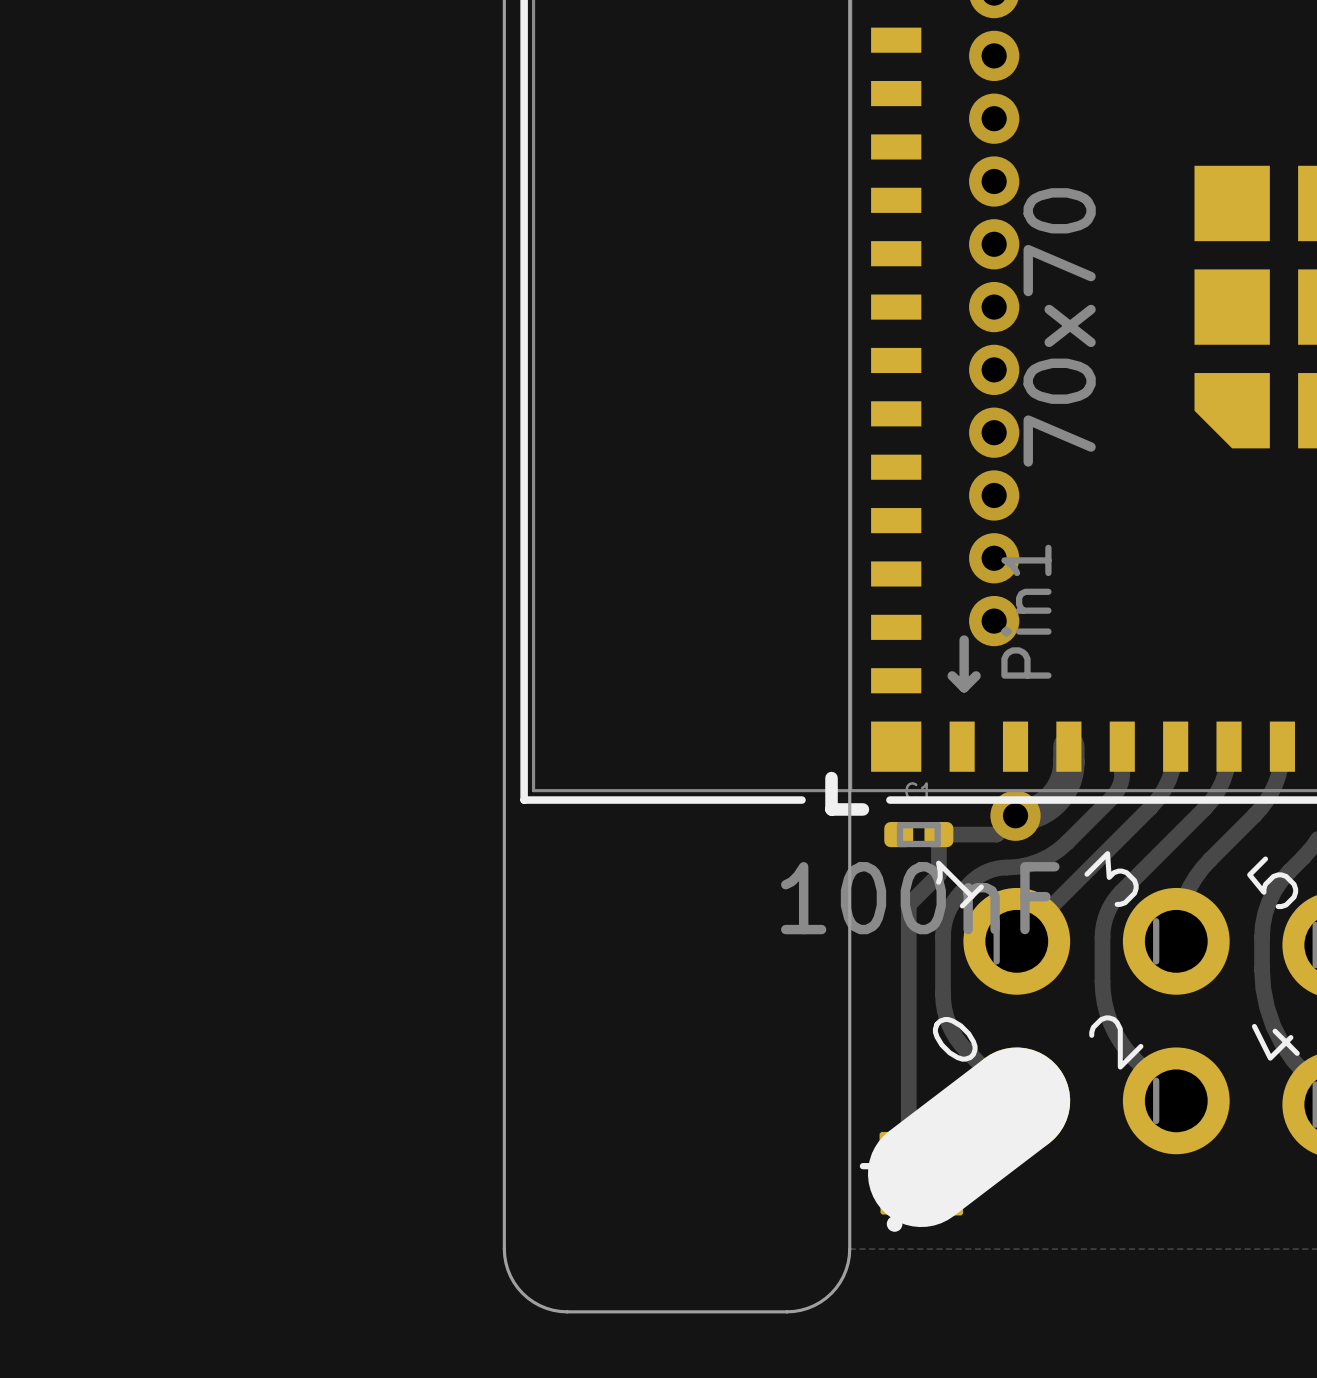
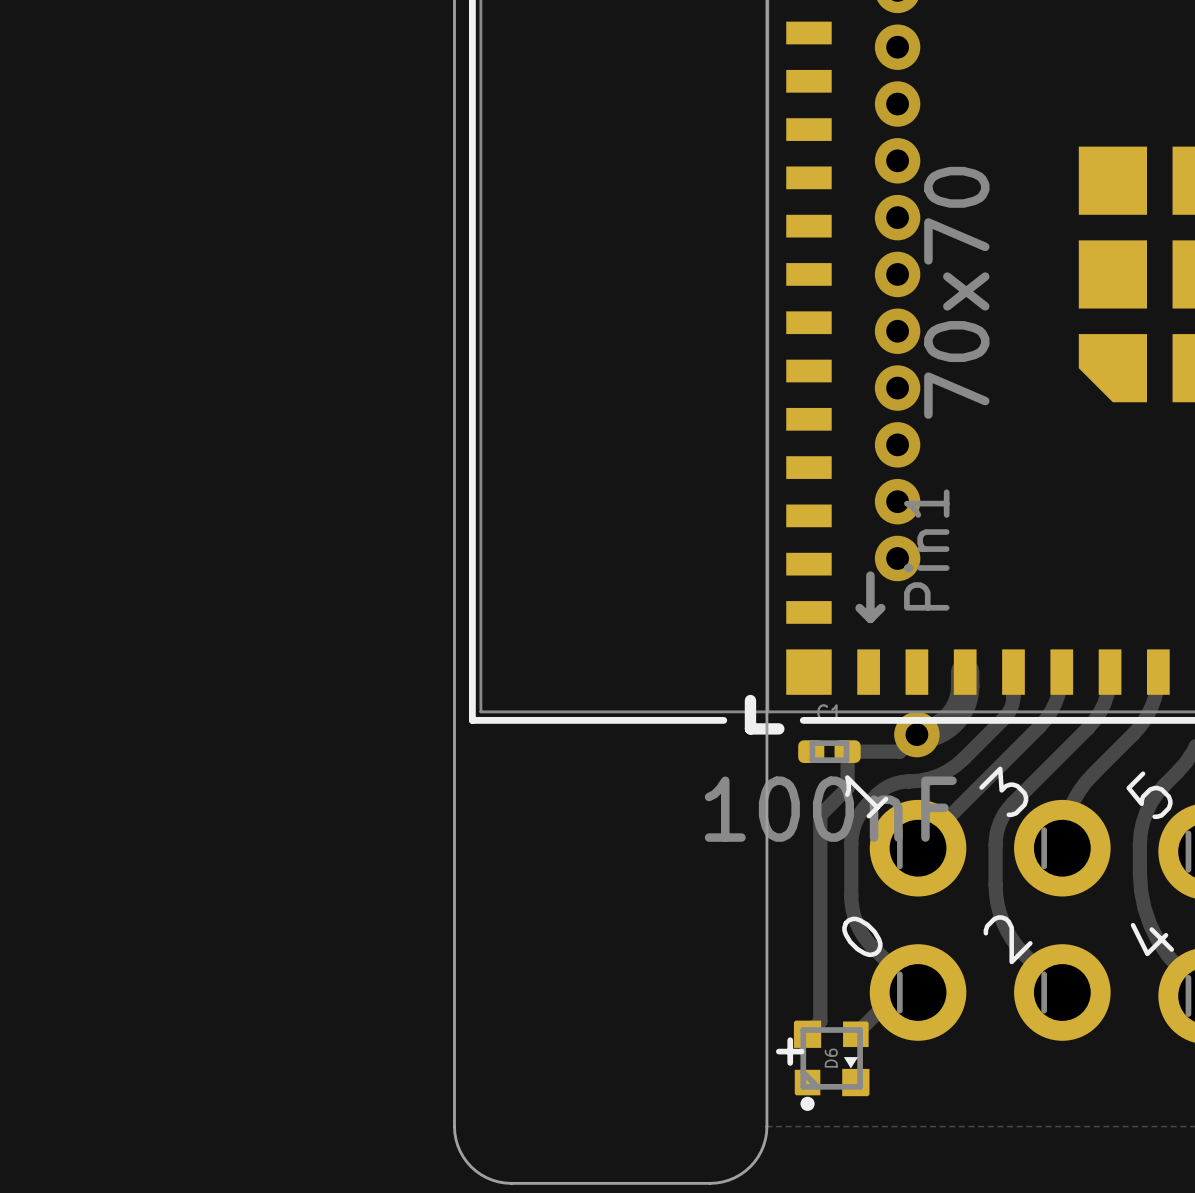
line: (1016, 1100) (921, 1173) -> none

